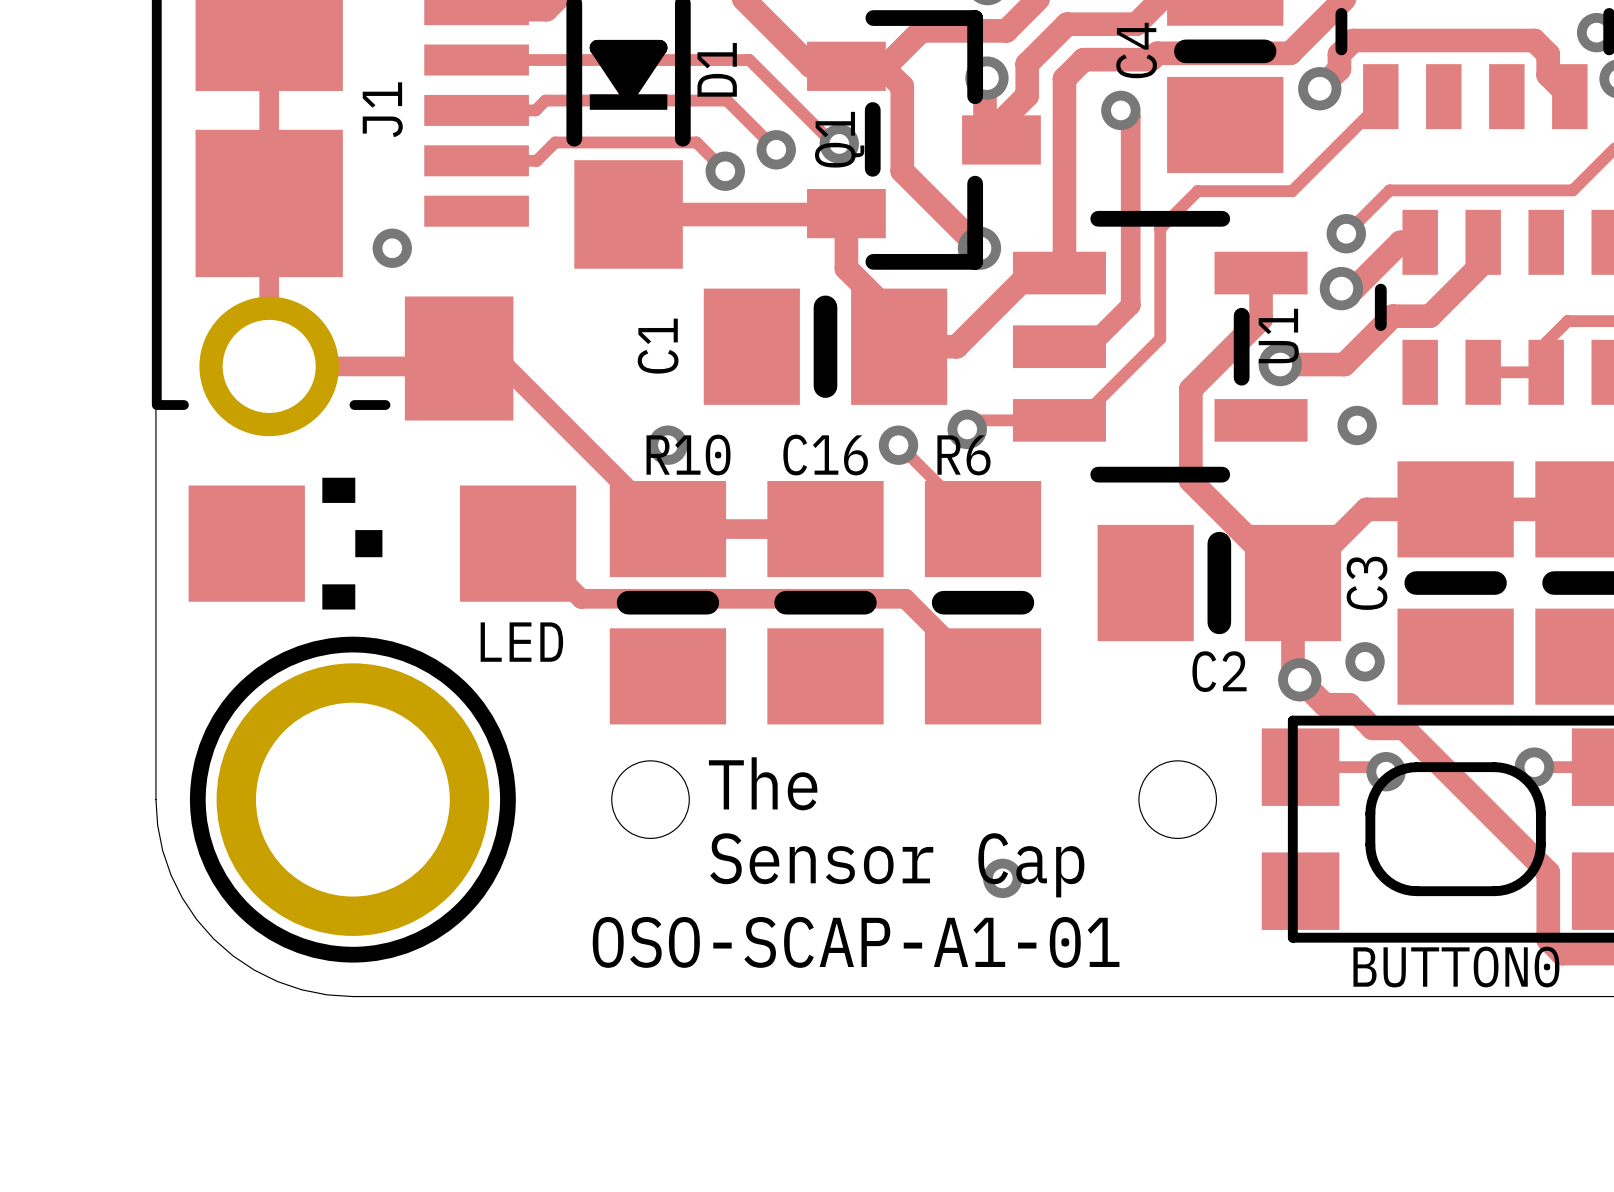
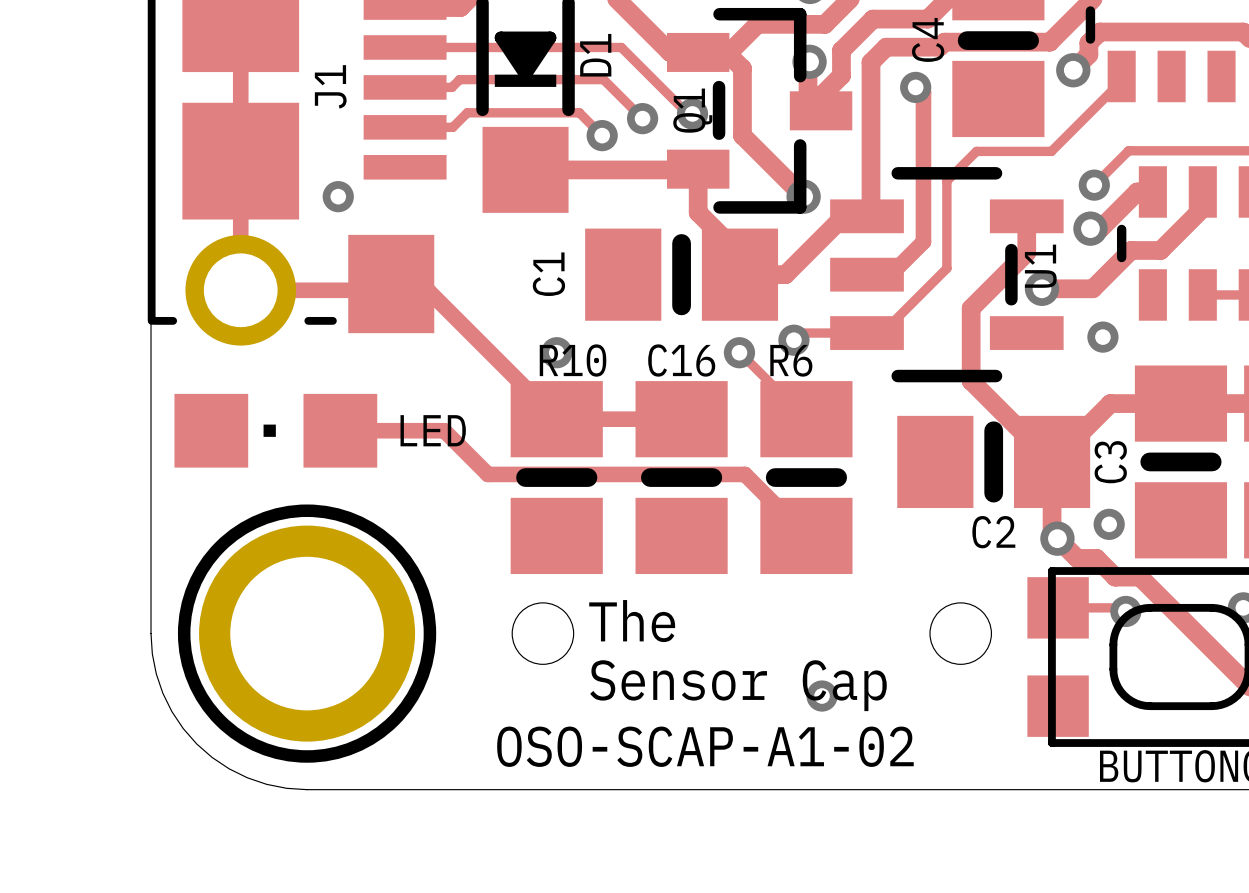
LED footprint: [188, 477, 577, 610] -> [174, 393, 378, 468]
track: none -> (340, 430) (437, 430)
text: OSO-SCAP-A1-01 (856, 942) -> OSO-SCAP-A1-02 (705, 746)

